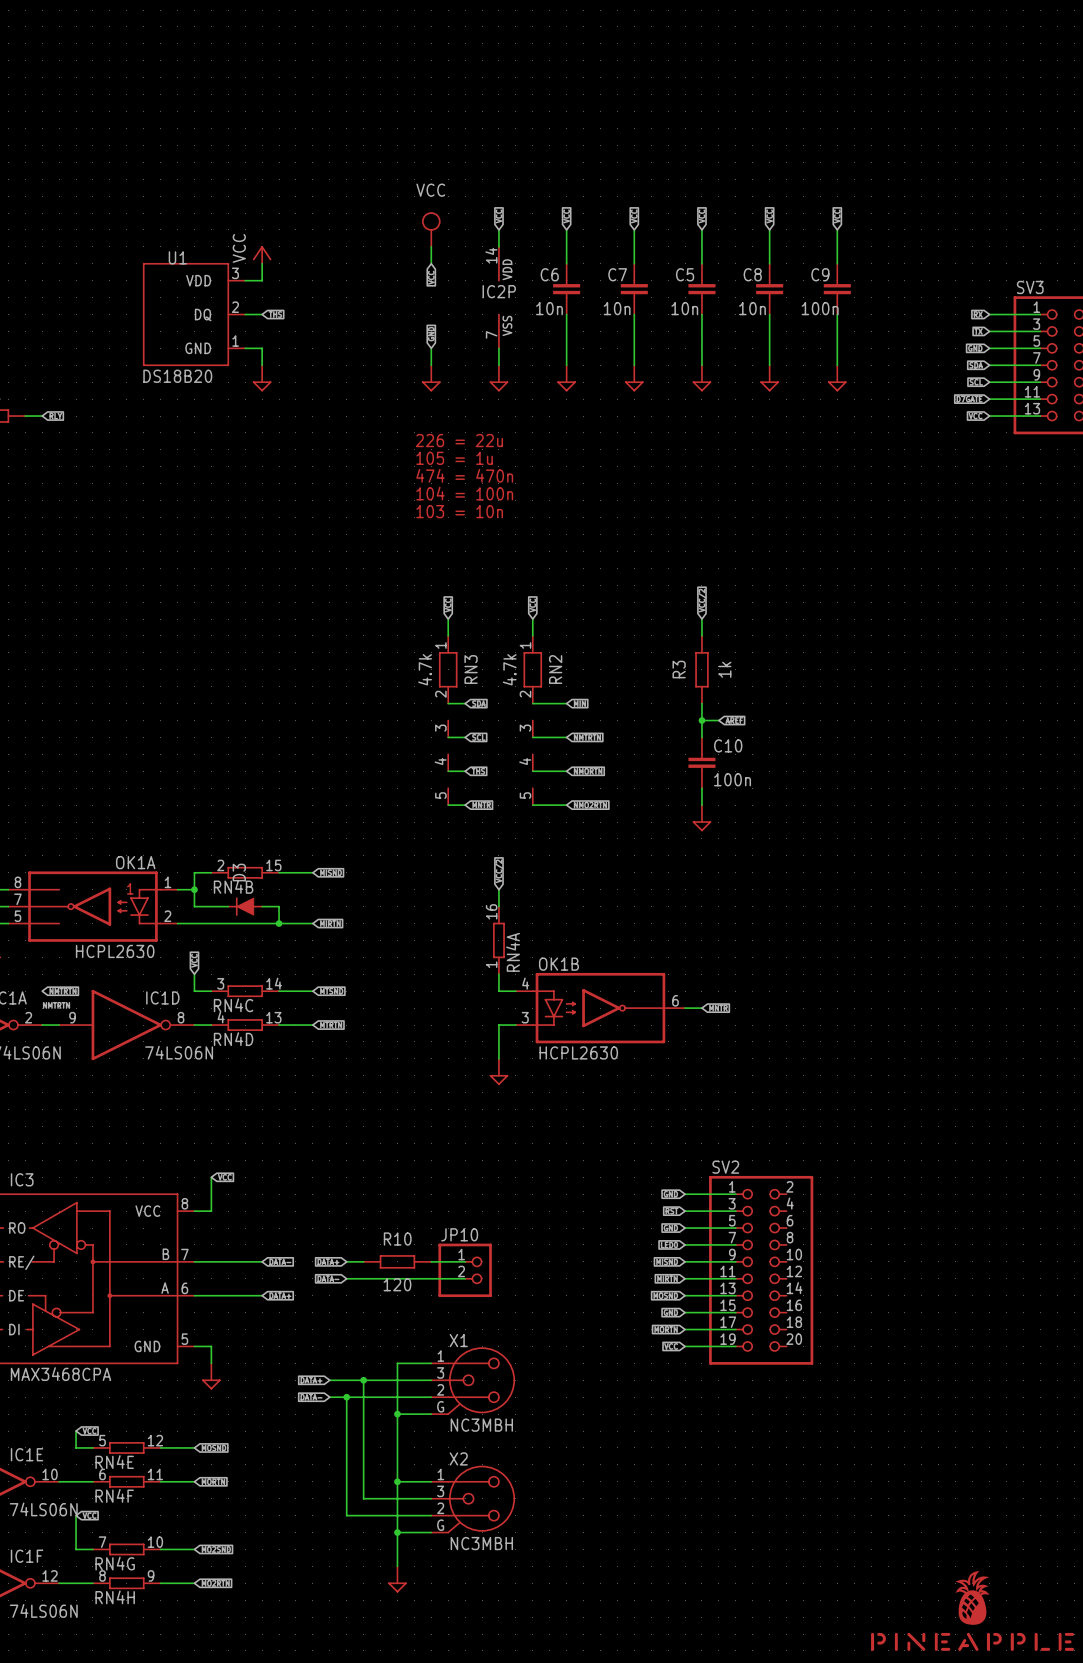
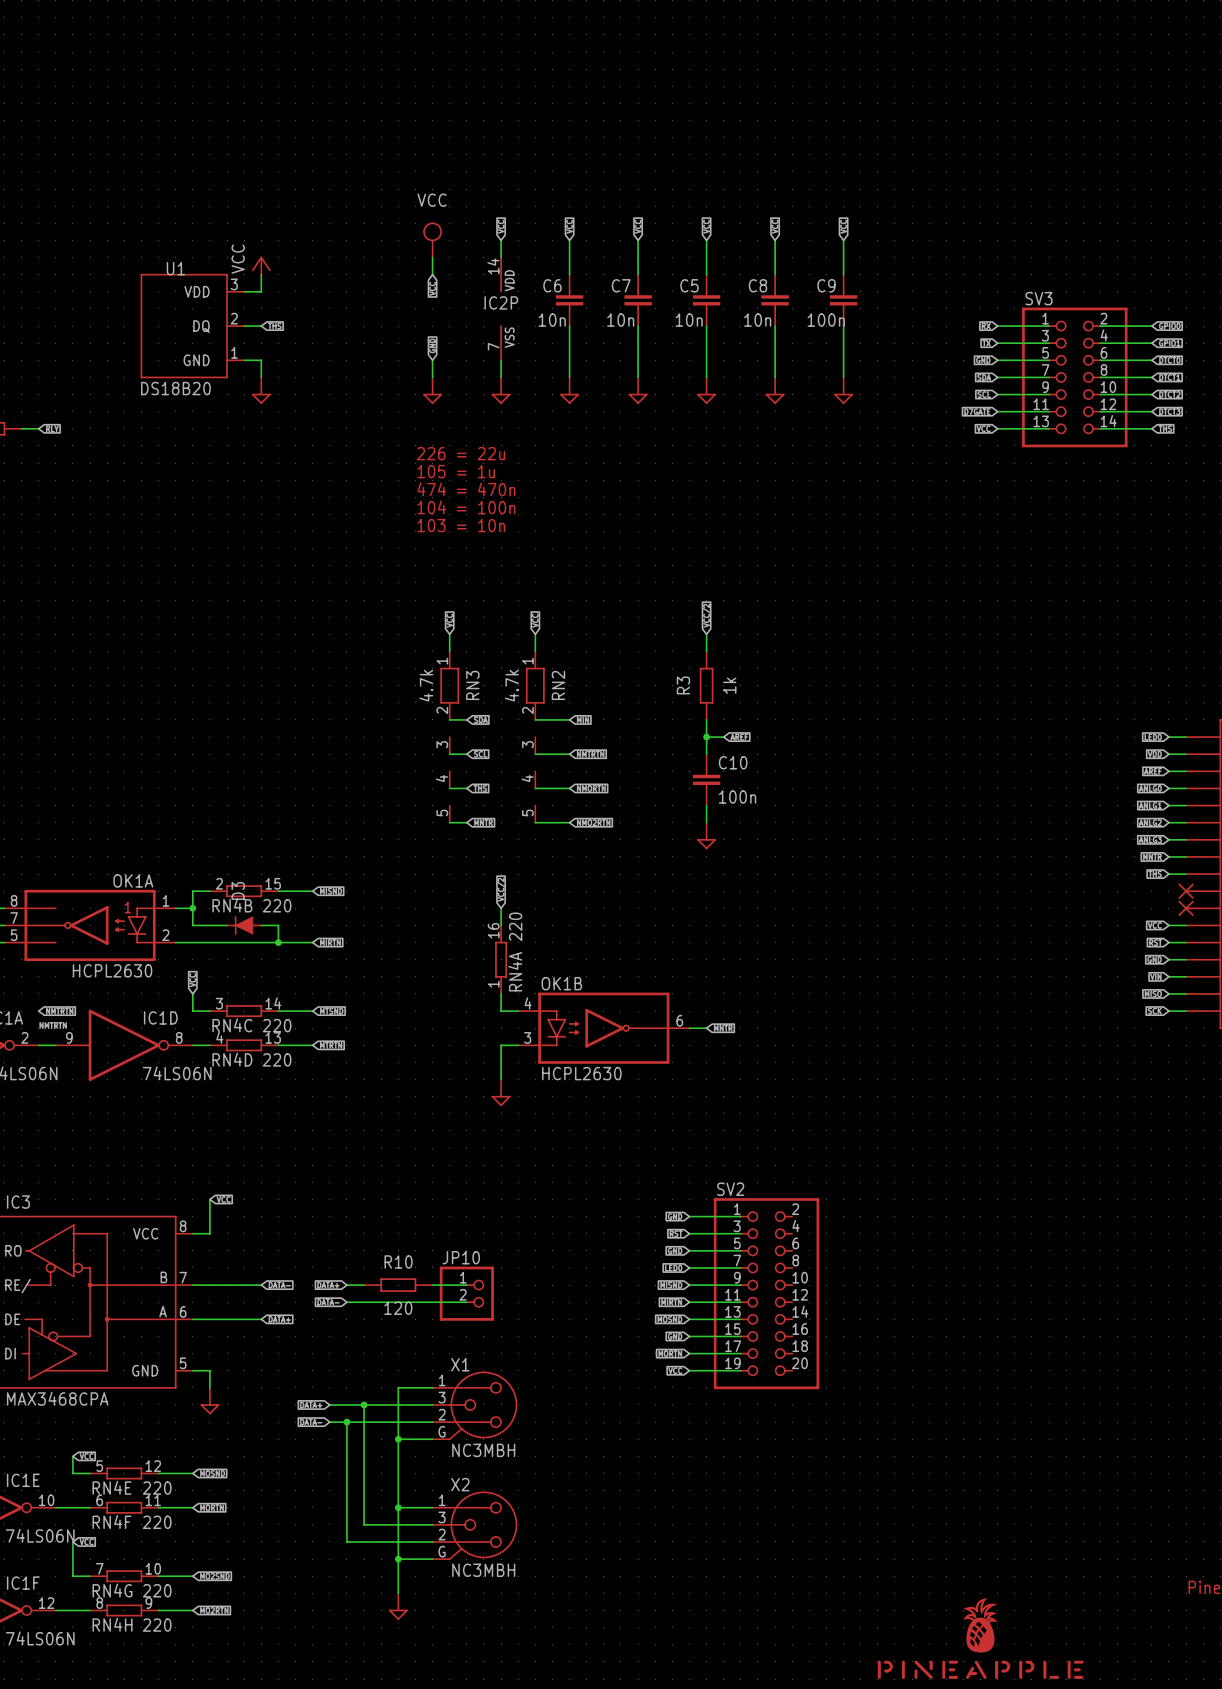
RN4B value: none -> 220 (277, 905)
RN4A value: none -> 220 (515, 926)
RN4C value: none -> 220 (277, 1025)
RN4D value: none -> 220 (277, 1059)
RN4E value: none -> 220 (157, 1488)
RN4F value: none -> 220 (157, 1522)
RN4G value: none -> 220 (157, 1590)
RN4H value: none -> 220 (157, 1625)

